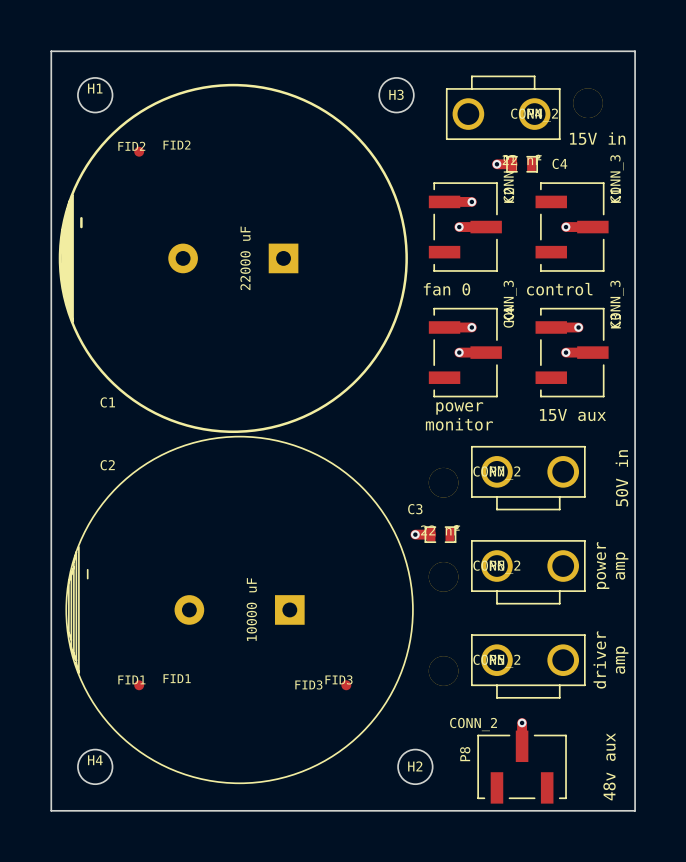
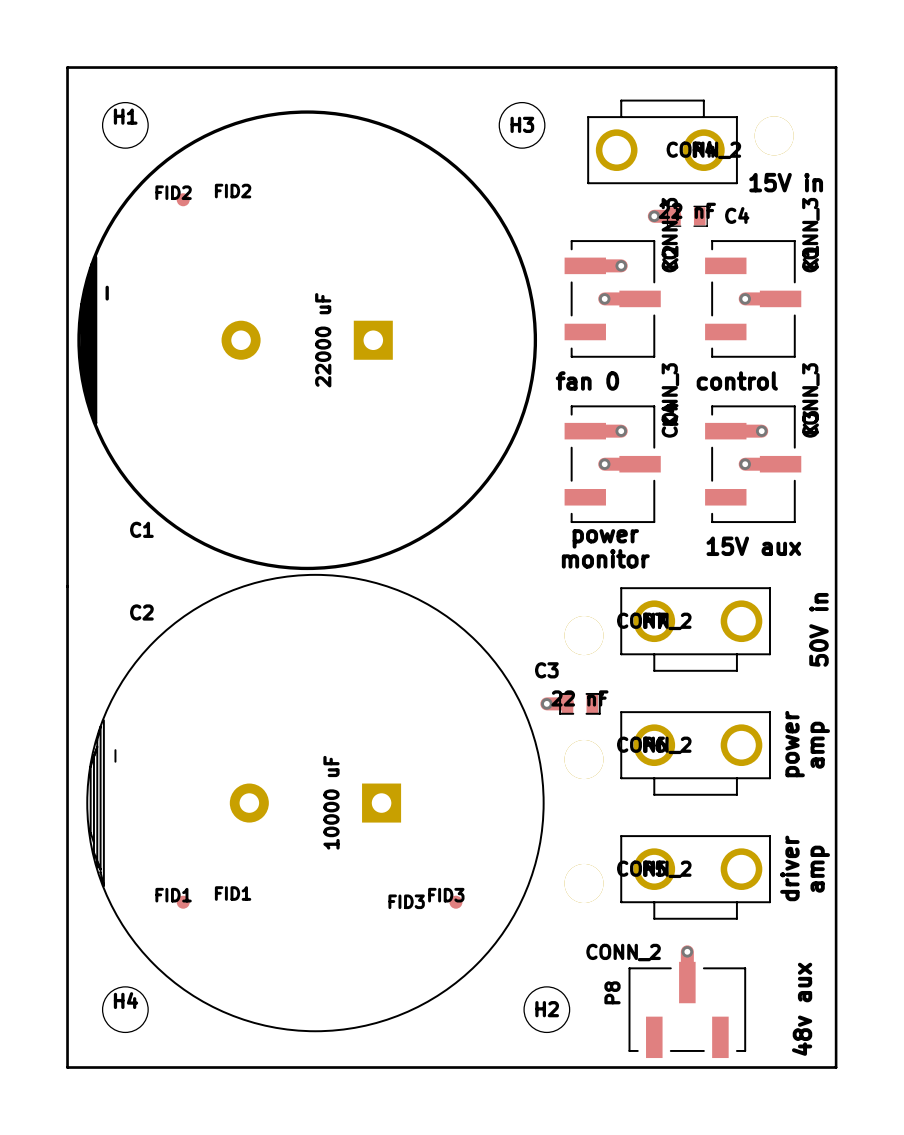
line: none -> (67, 67) (67, 1067) (836, 1067) (836, 67) (67, 67)

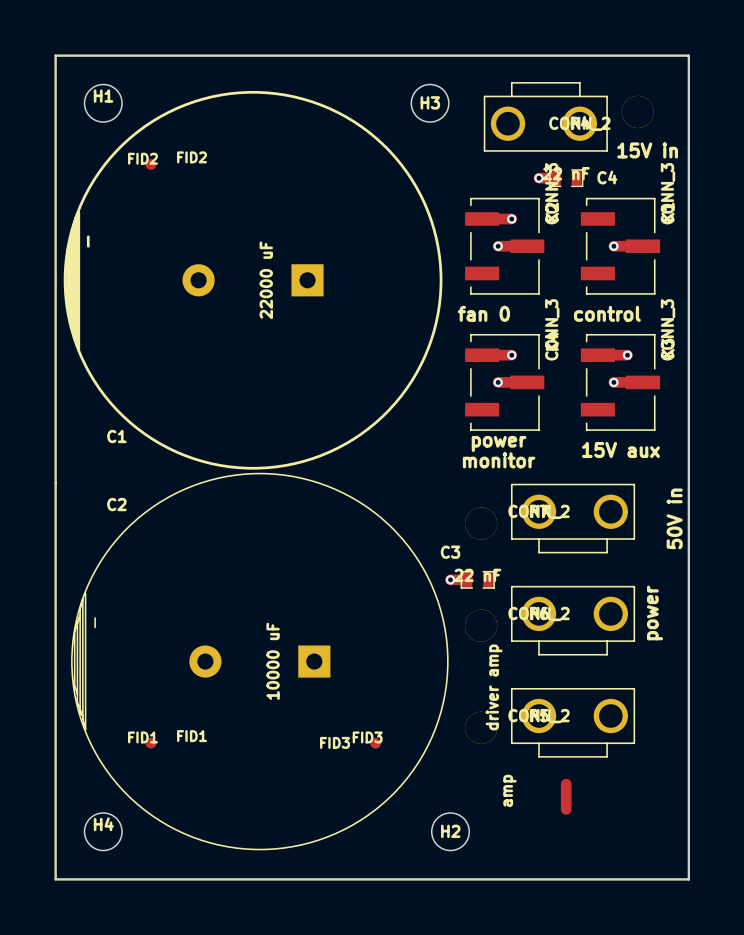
text: amp (820, 745) -> none
text: none -> driver amp (494, 687)
text: driver (789, 868) -> none
text: amp (820, 869) -> none
via: (687, 951) -> none
text: none -> amp (509, 790)
P8: CONN_2 (687, 1009) -> none
text: 48v aux (802, 1009) -> none

